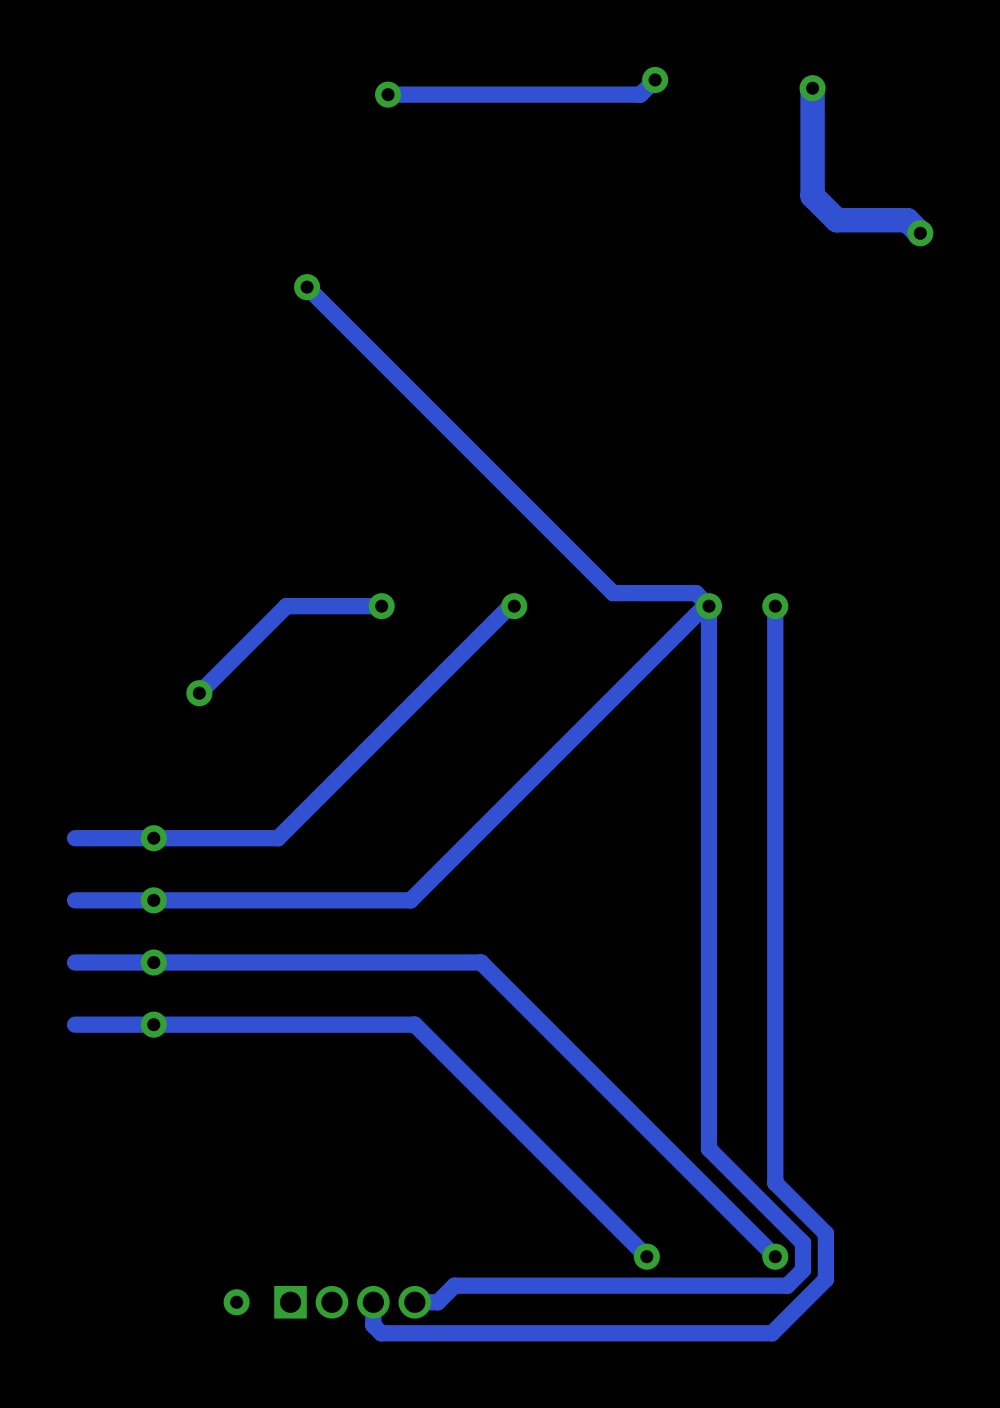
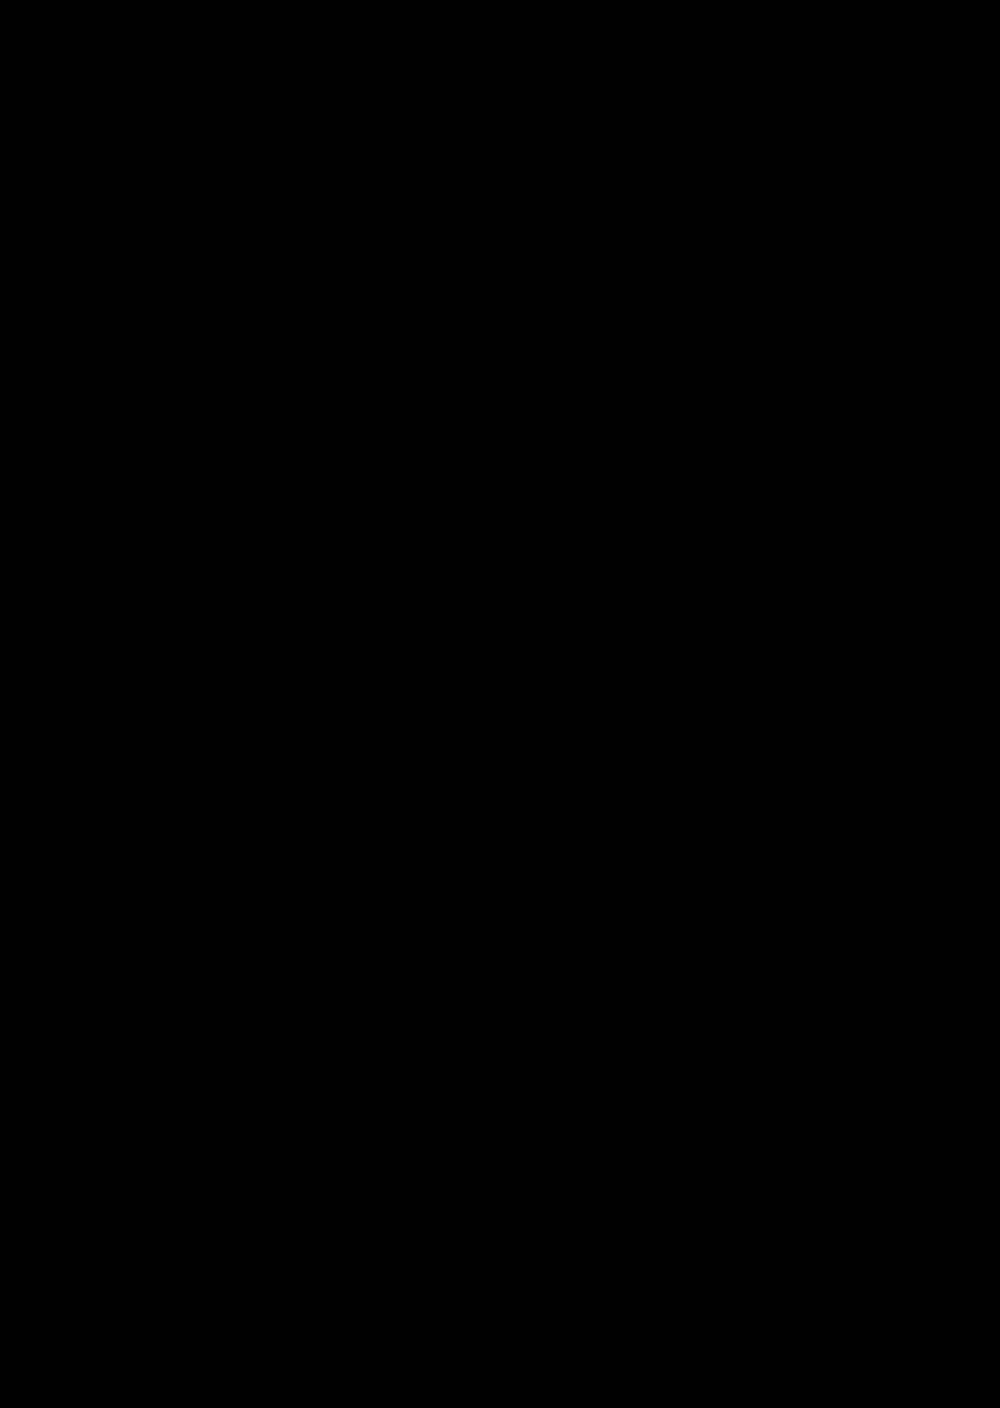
track: (655, 79) (640, 94) (388, 94) -> none
via: (655, 79) -> none
track: (812, 88) (812, 195) (836, 220) (907, 220) (920, 233) -> none
via: (812, 88) -> none
via: (388, 94) -> none
via: (920, 233) -> none
track: (307, 287) (613, 593) (695, 593) (709, 606) -> none
via: (307, 287) -> none
track: (514, 602) (278, 838) (75, 838) -> none
track: (775, 602) (775, 1182) (825, 1233) (825, 1279) (772, 1333) (381, 1333) (373, 1325) (373, 1302) -> none
track: (381, 606) (286, 606) (199, 693) -> none
via: (381, 606) -> none
via: (514, 606) -> none
via: (709, 606) -> none
via: (775, 606) -> none
via: (199, 693) -> none
via: (153, 838) -> none
track: (75, 900) (410, 900) (709, 602) (709, 1148) (803, 1242) (803, 1270) (787, 1285) (454, 1285) (437, 1302) (414, 1302) -> none
via: (153, 900) -> none
track: (75, 962) (481, 962) (775, 1256) -> none
via: (153, 962) -> none
track: (75, 1024) (414, 1024) (646, 1256) -> none
via: (153, 1024) -> none
via: (646, 1256) -> none
via: (775, 1256) -> none
via: (236, 1302) -> none
part: (352, 1302) -> none

